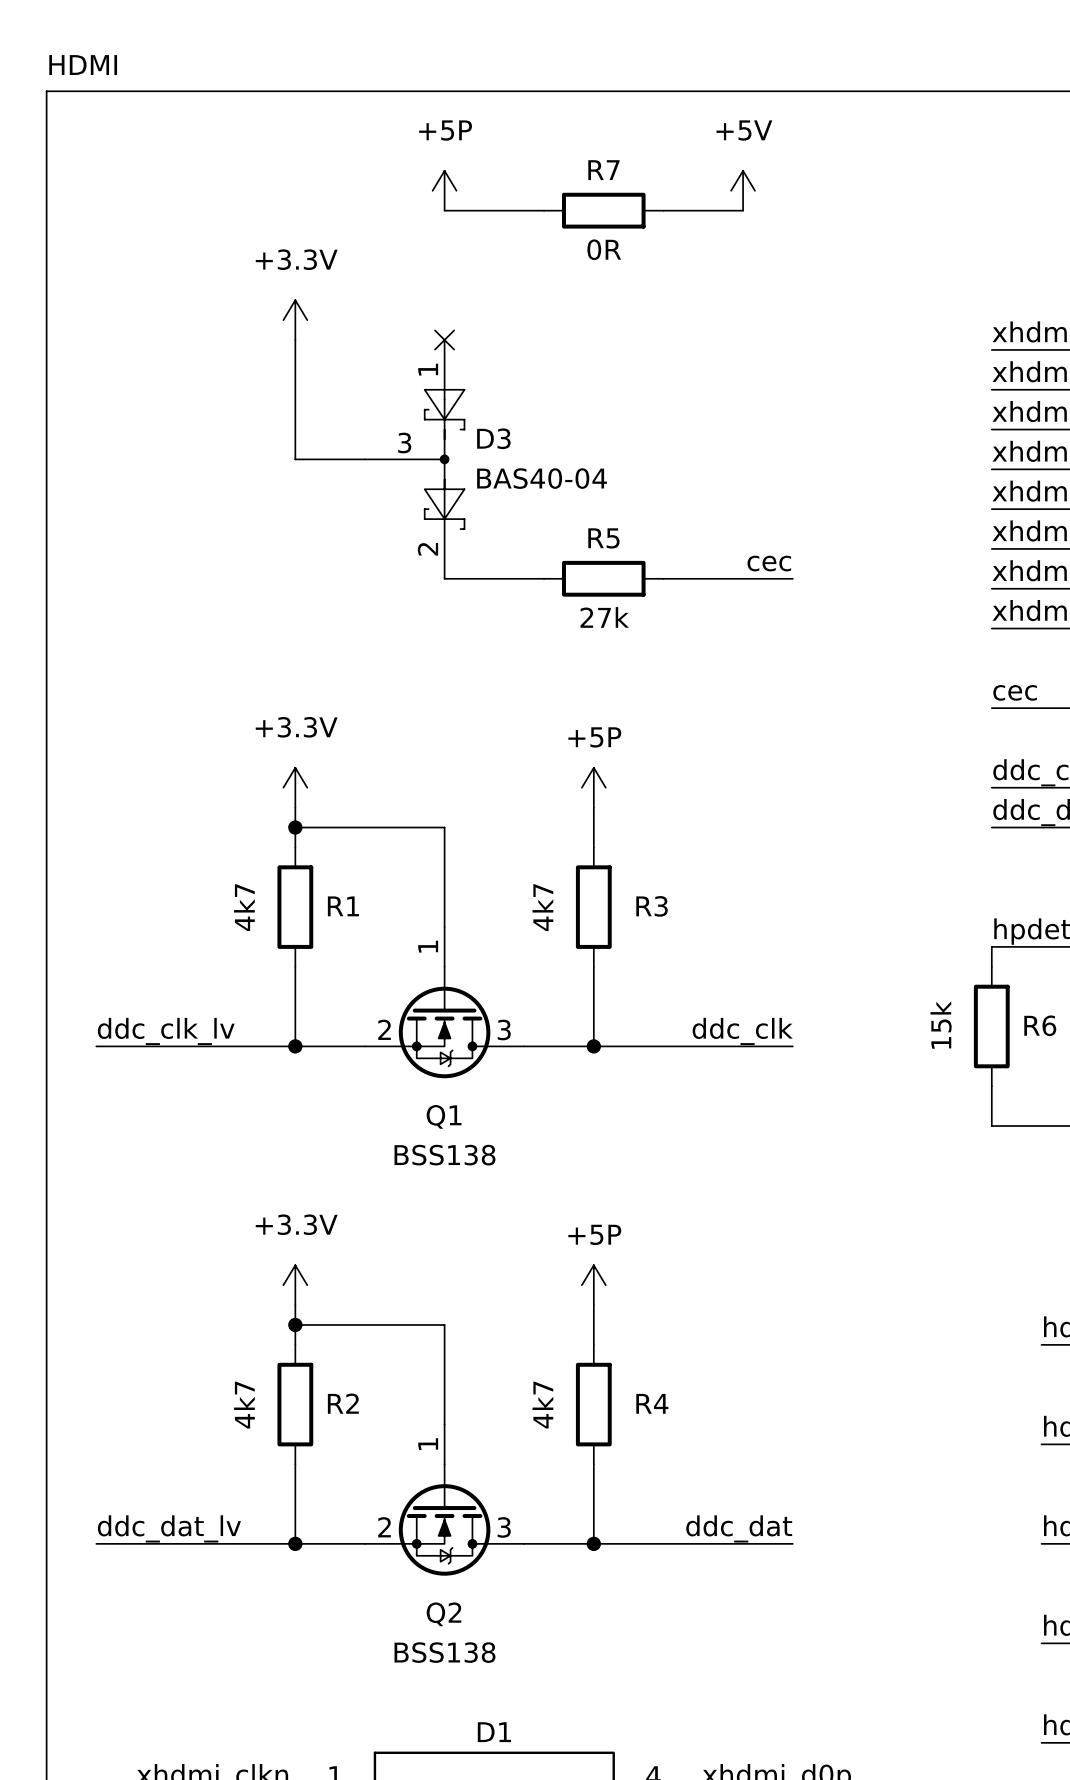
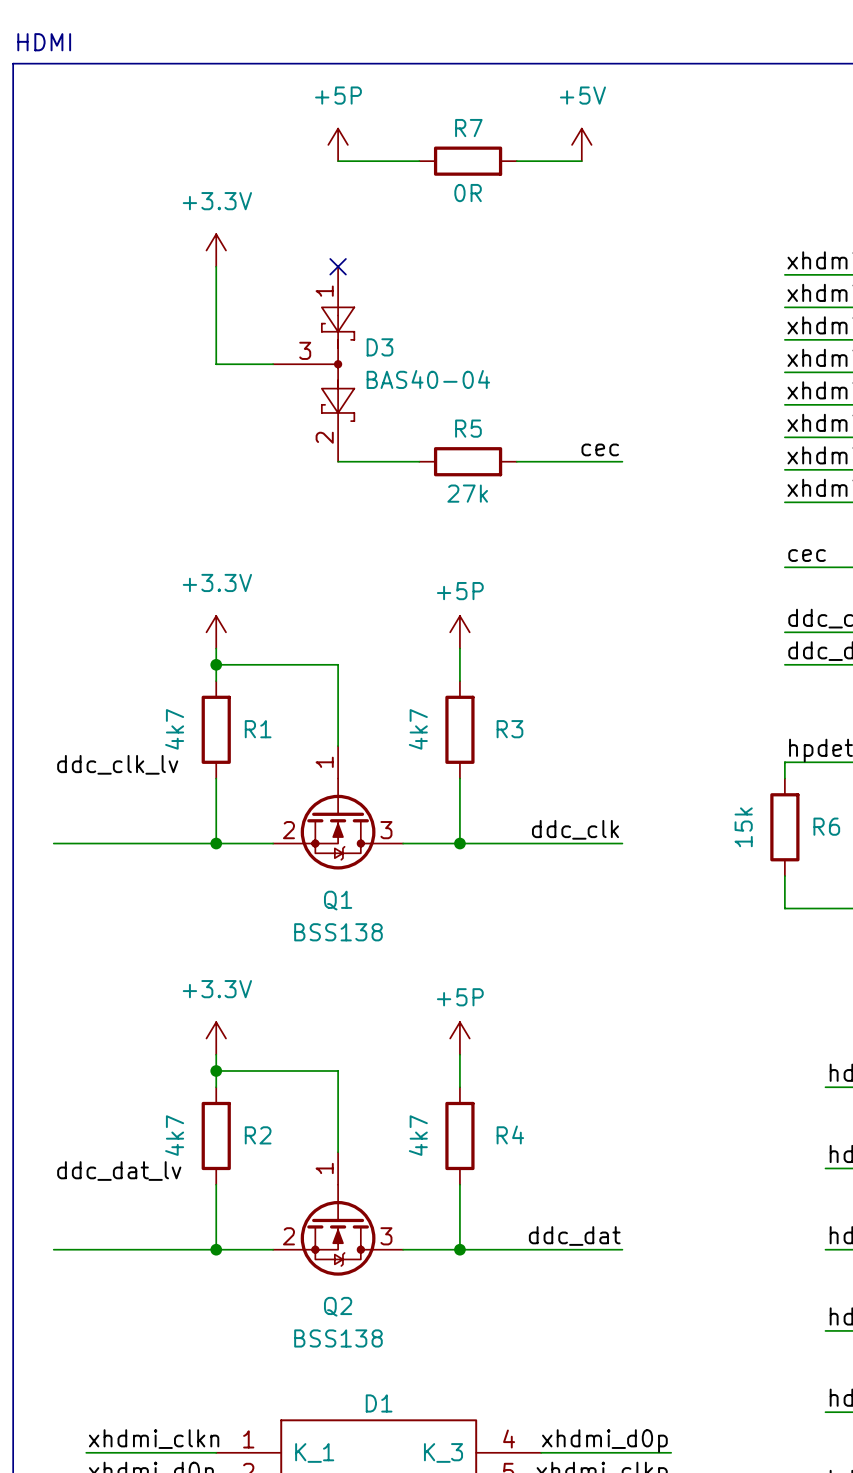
label position: ddc_clk_lv (166, 1031) -> ddc_clk_lv (117, 764)
label position: ddc_dat_lv (169, 1528) -> ddc_dat_lv (119, 1171)

